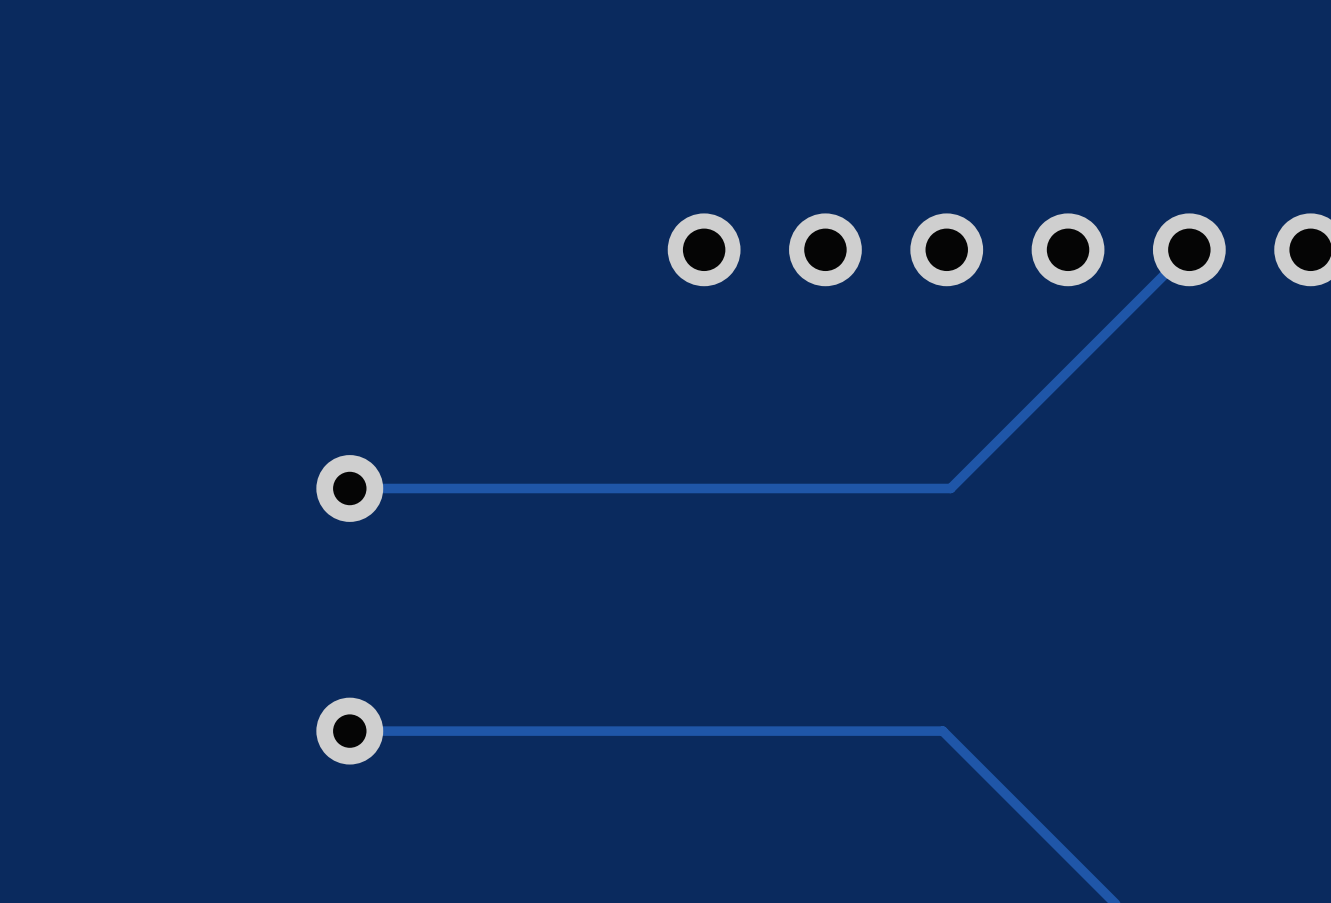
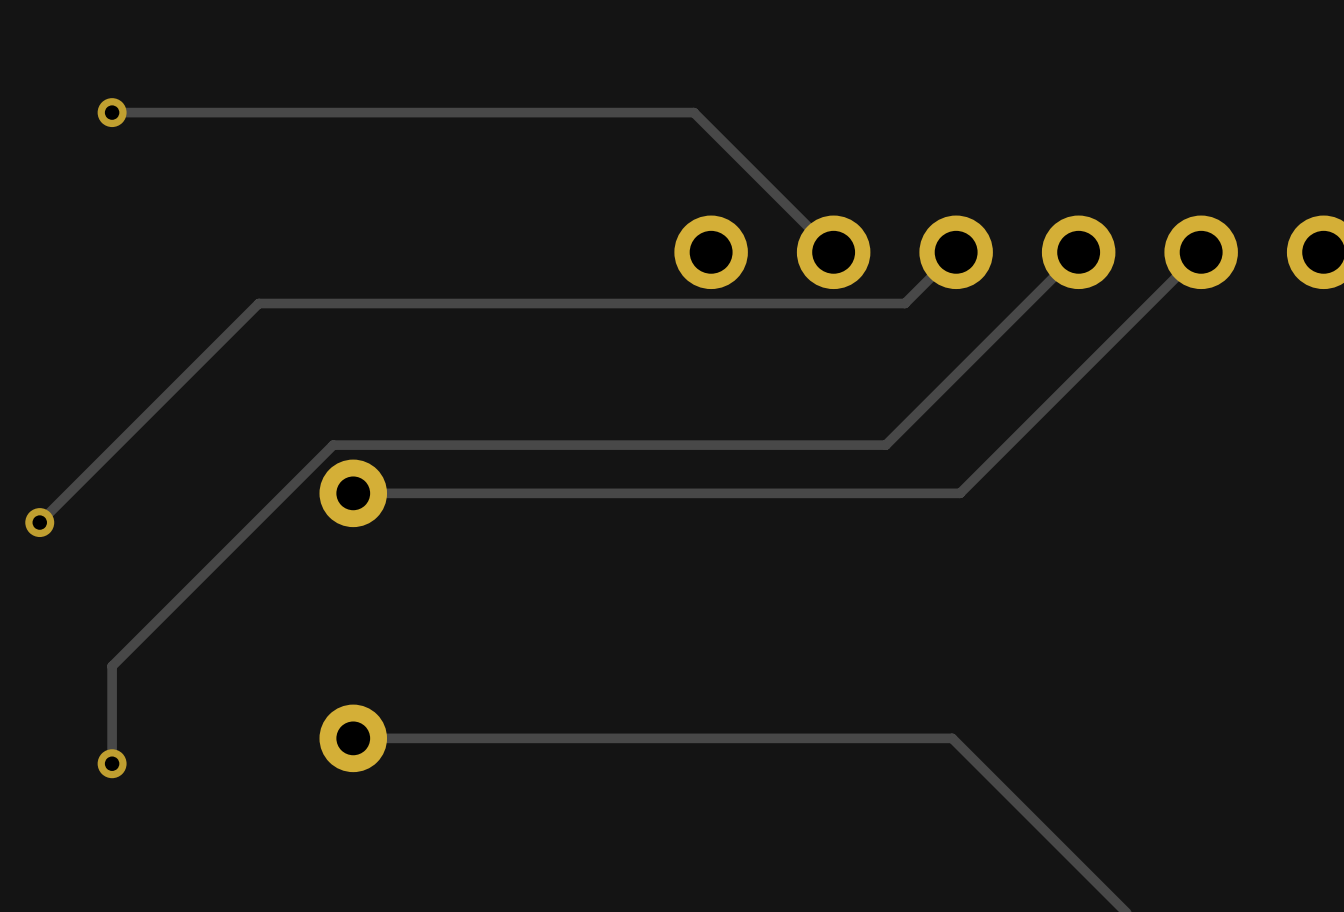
track: none -> (112, 112) (693, 112) (833, 252)
via: none -> (112, 112)
track: none -> (956, 252) (904, 303) (258, 303) (39, 522)
track: none -> (1078, 252) (885, 445) (333, 445) (112, 666) (112, 763)
via: none -> (39, 522)
via: none -> (112, 763)

